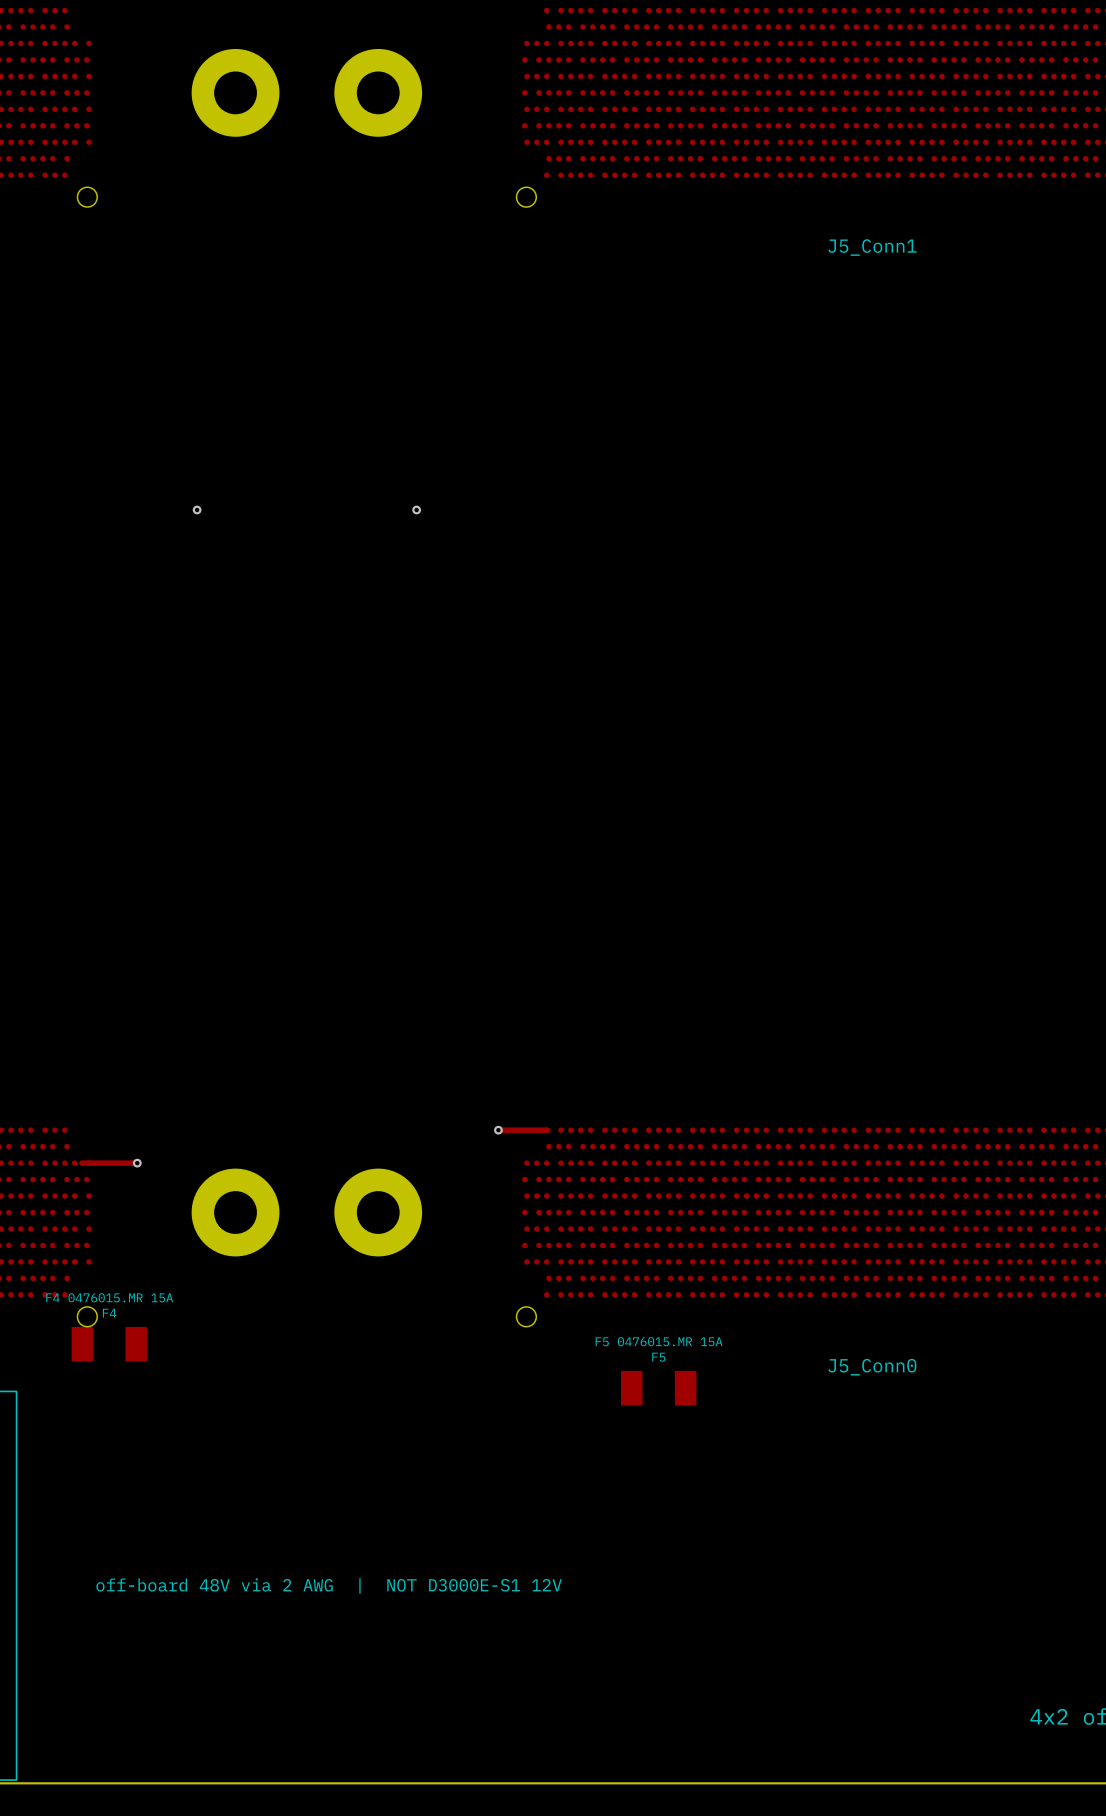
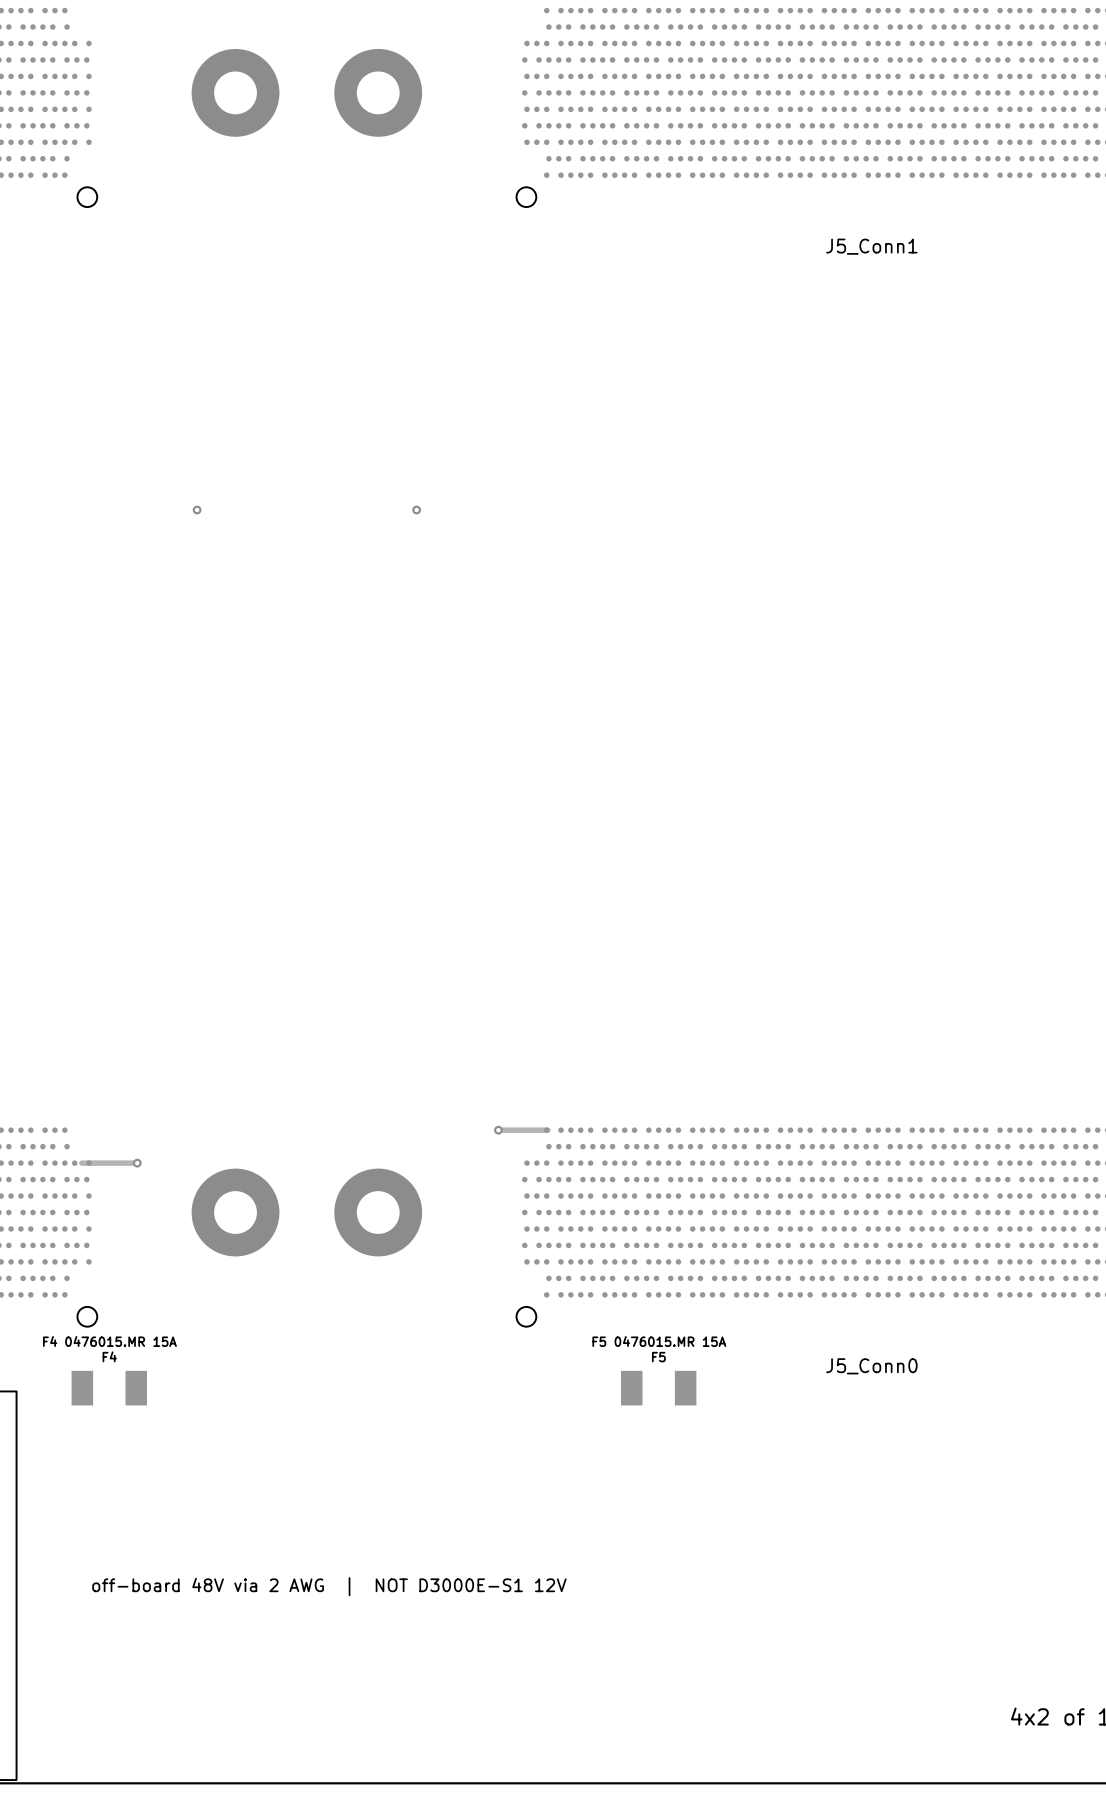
text position: F4 0476015.MR 15A (109, 1297) -> F4 0476015.MR 15A (109, 1341)
F4 position: (109, 1344) -> (109, 1388)

